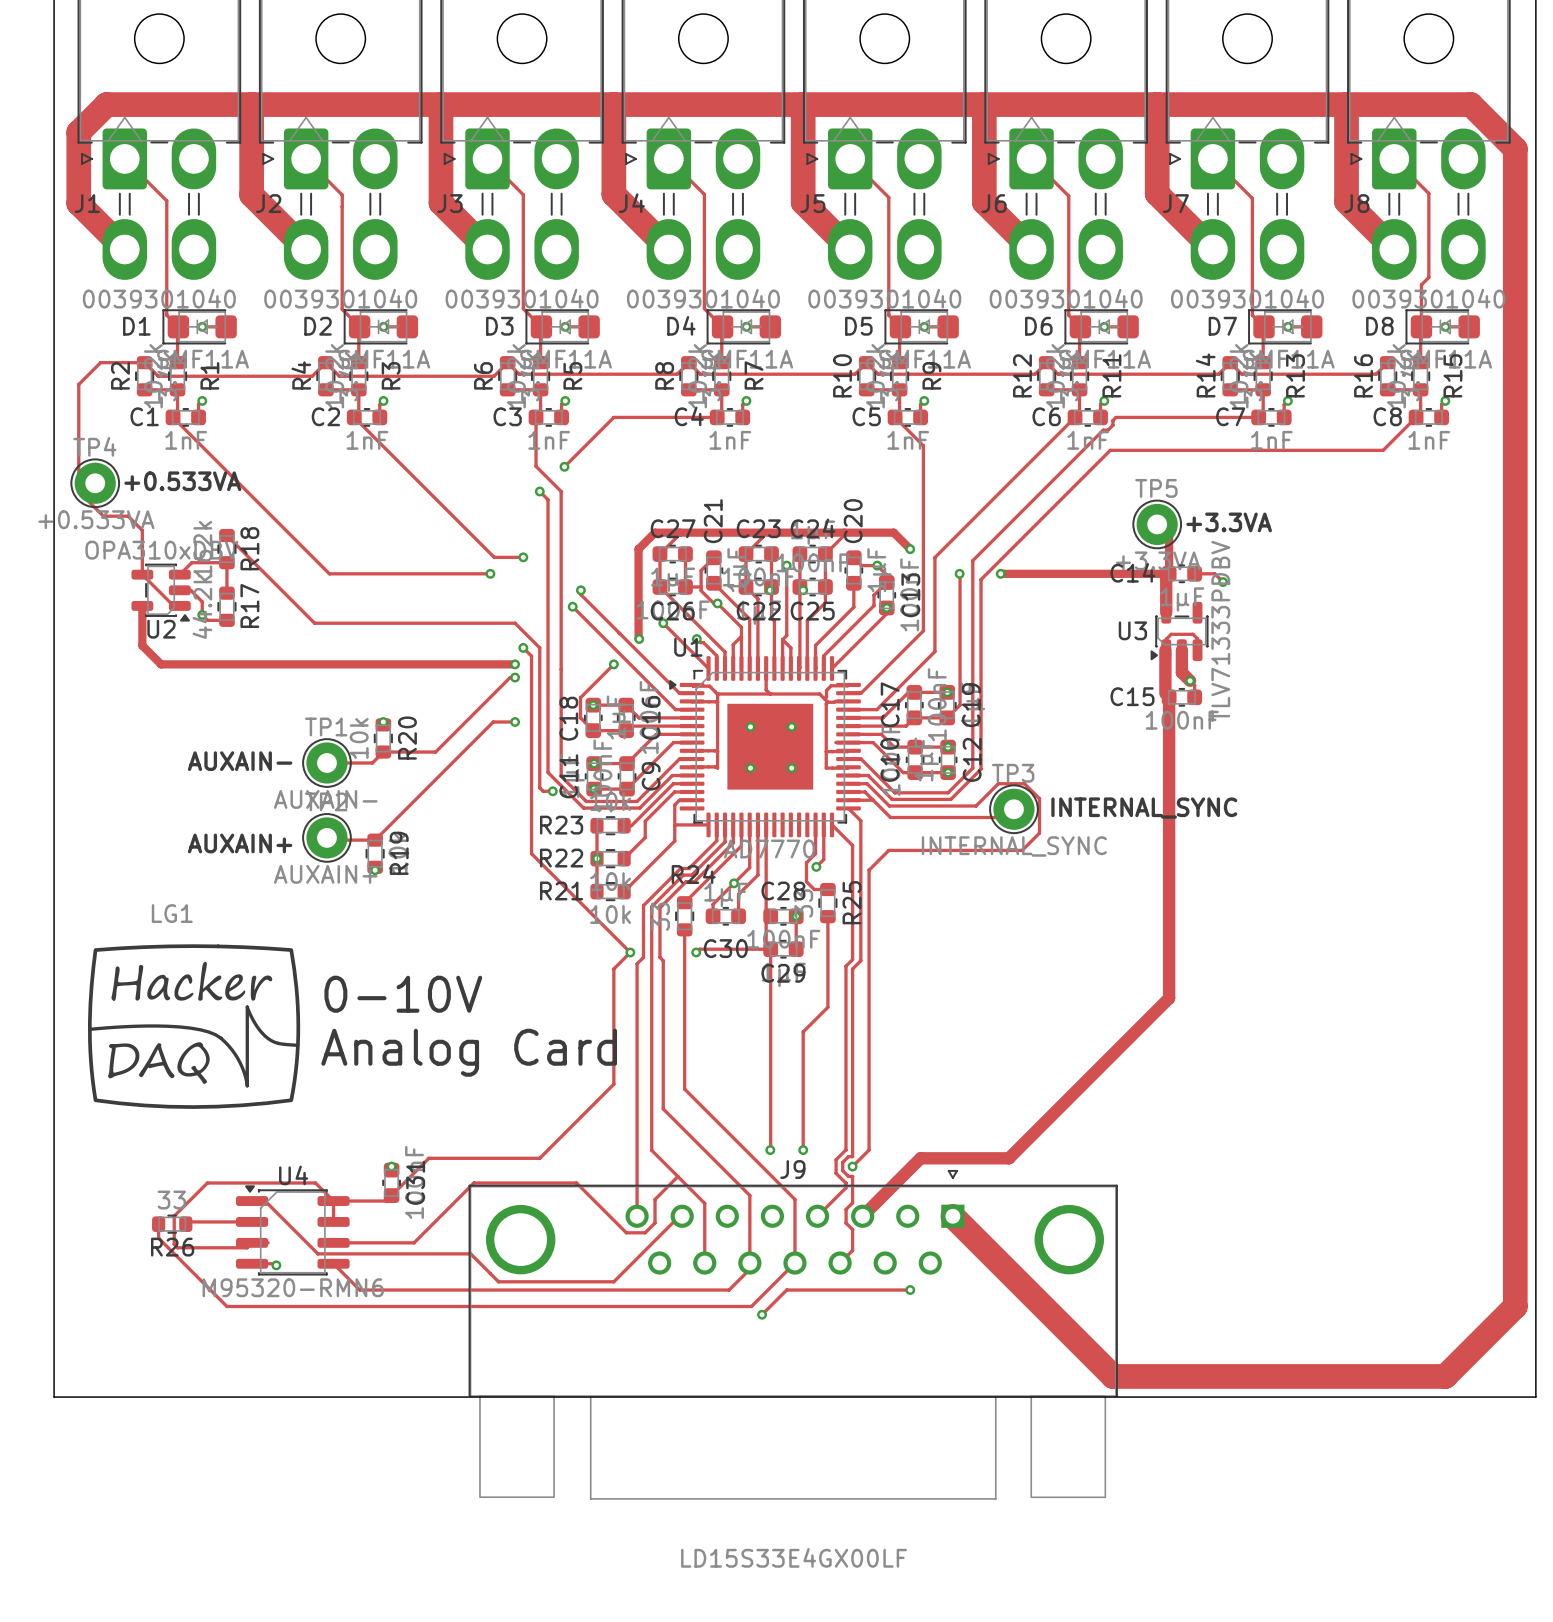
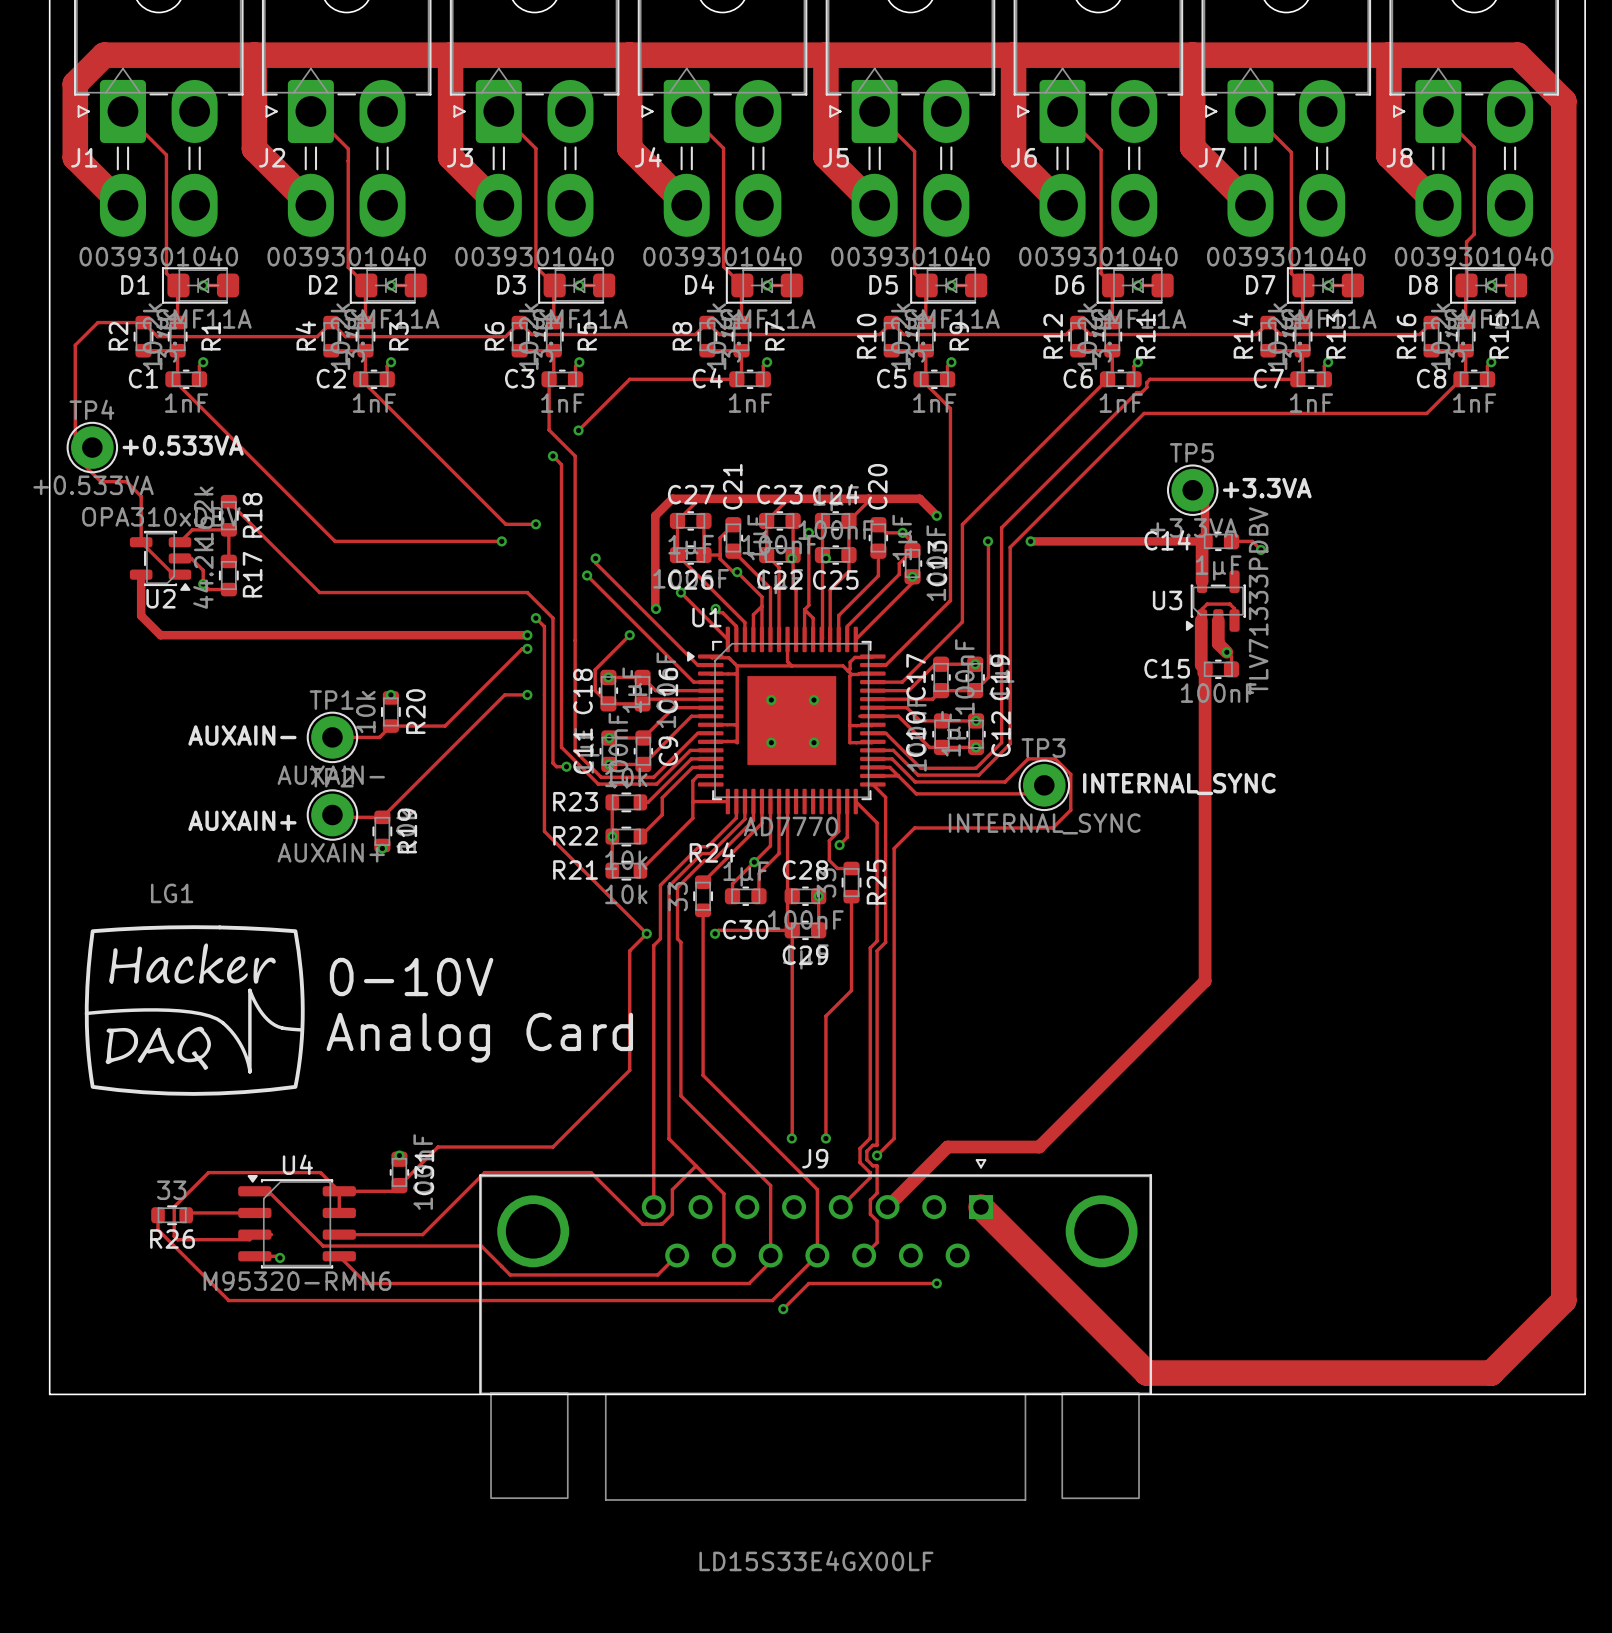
track: (682, 1216) (679, 1216) (613, 1281) -> (677, 1255) (657, 1274) (629, 1274)

